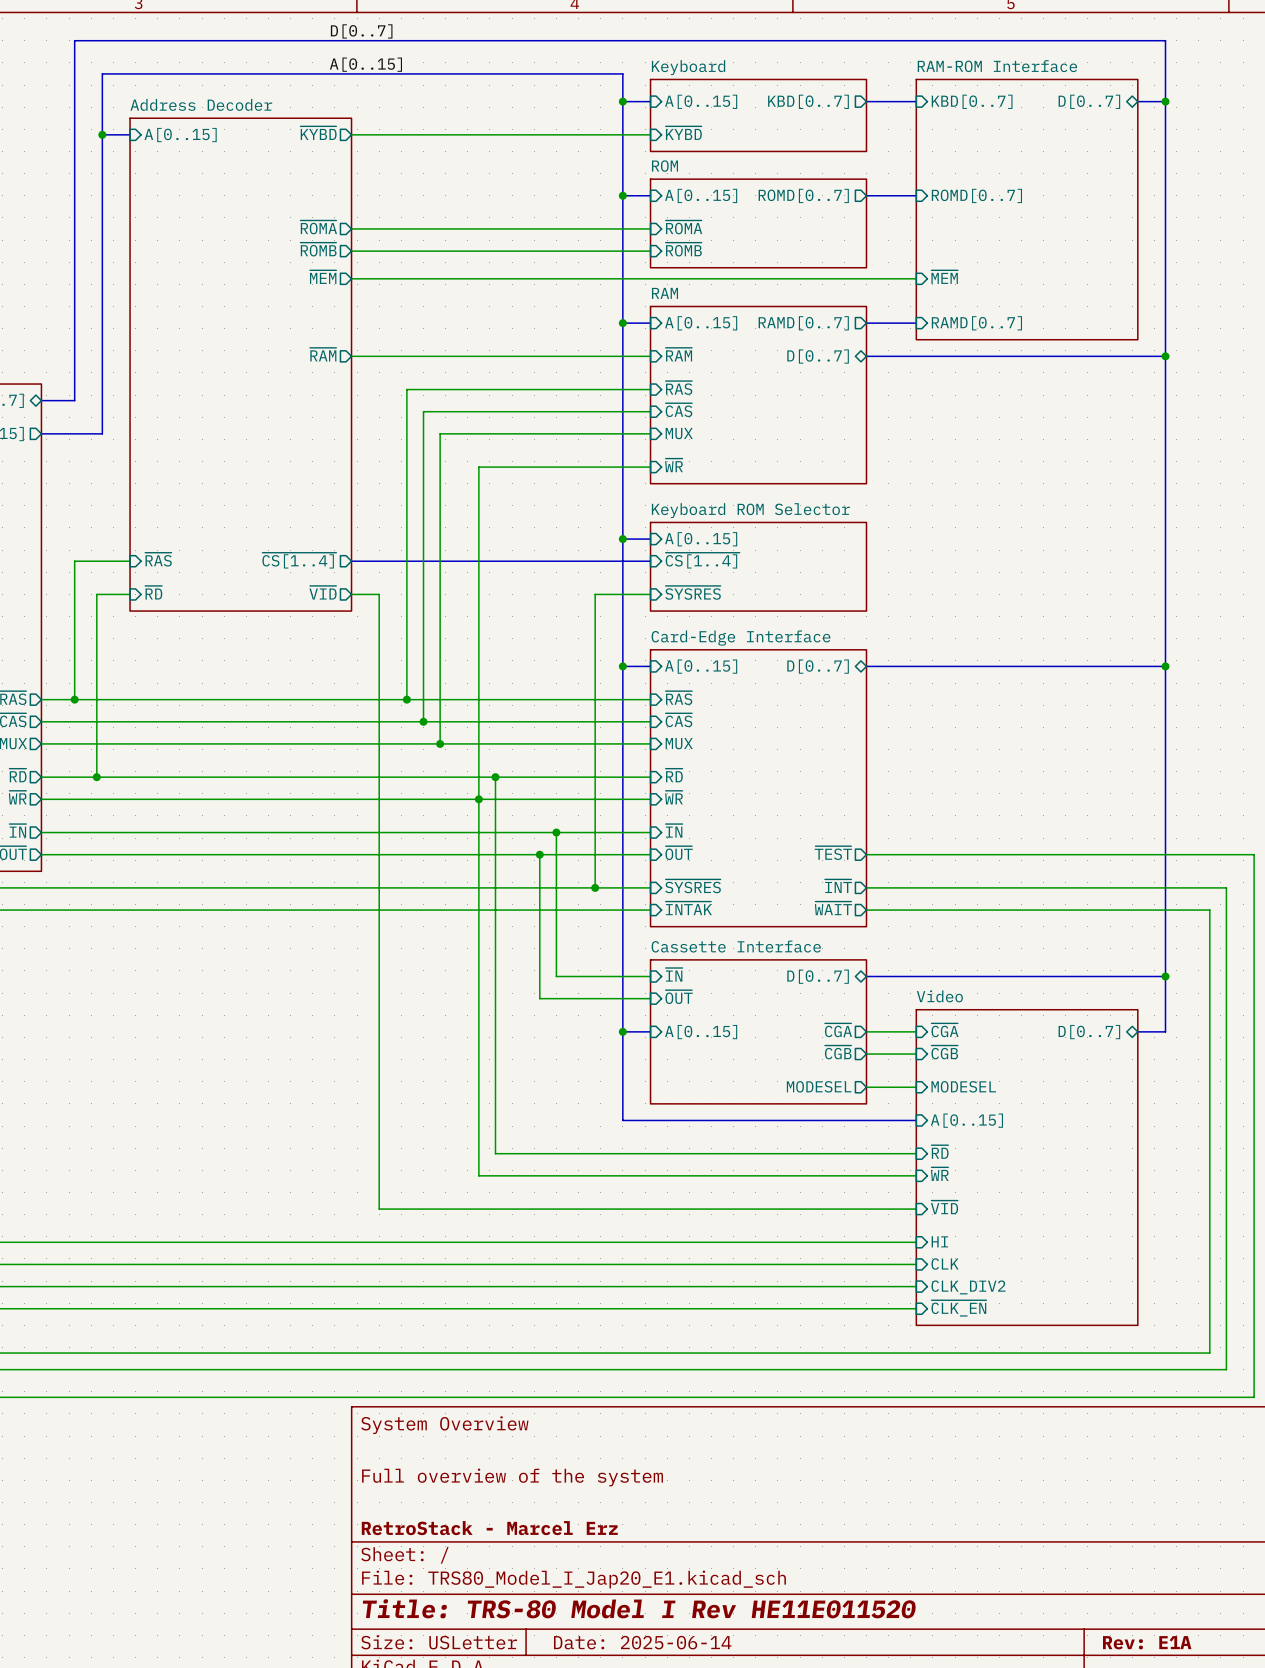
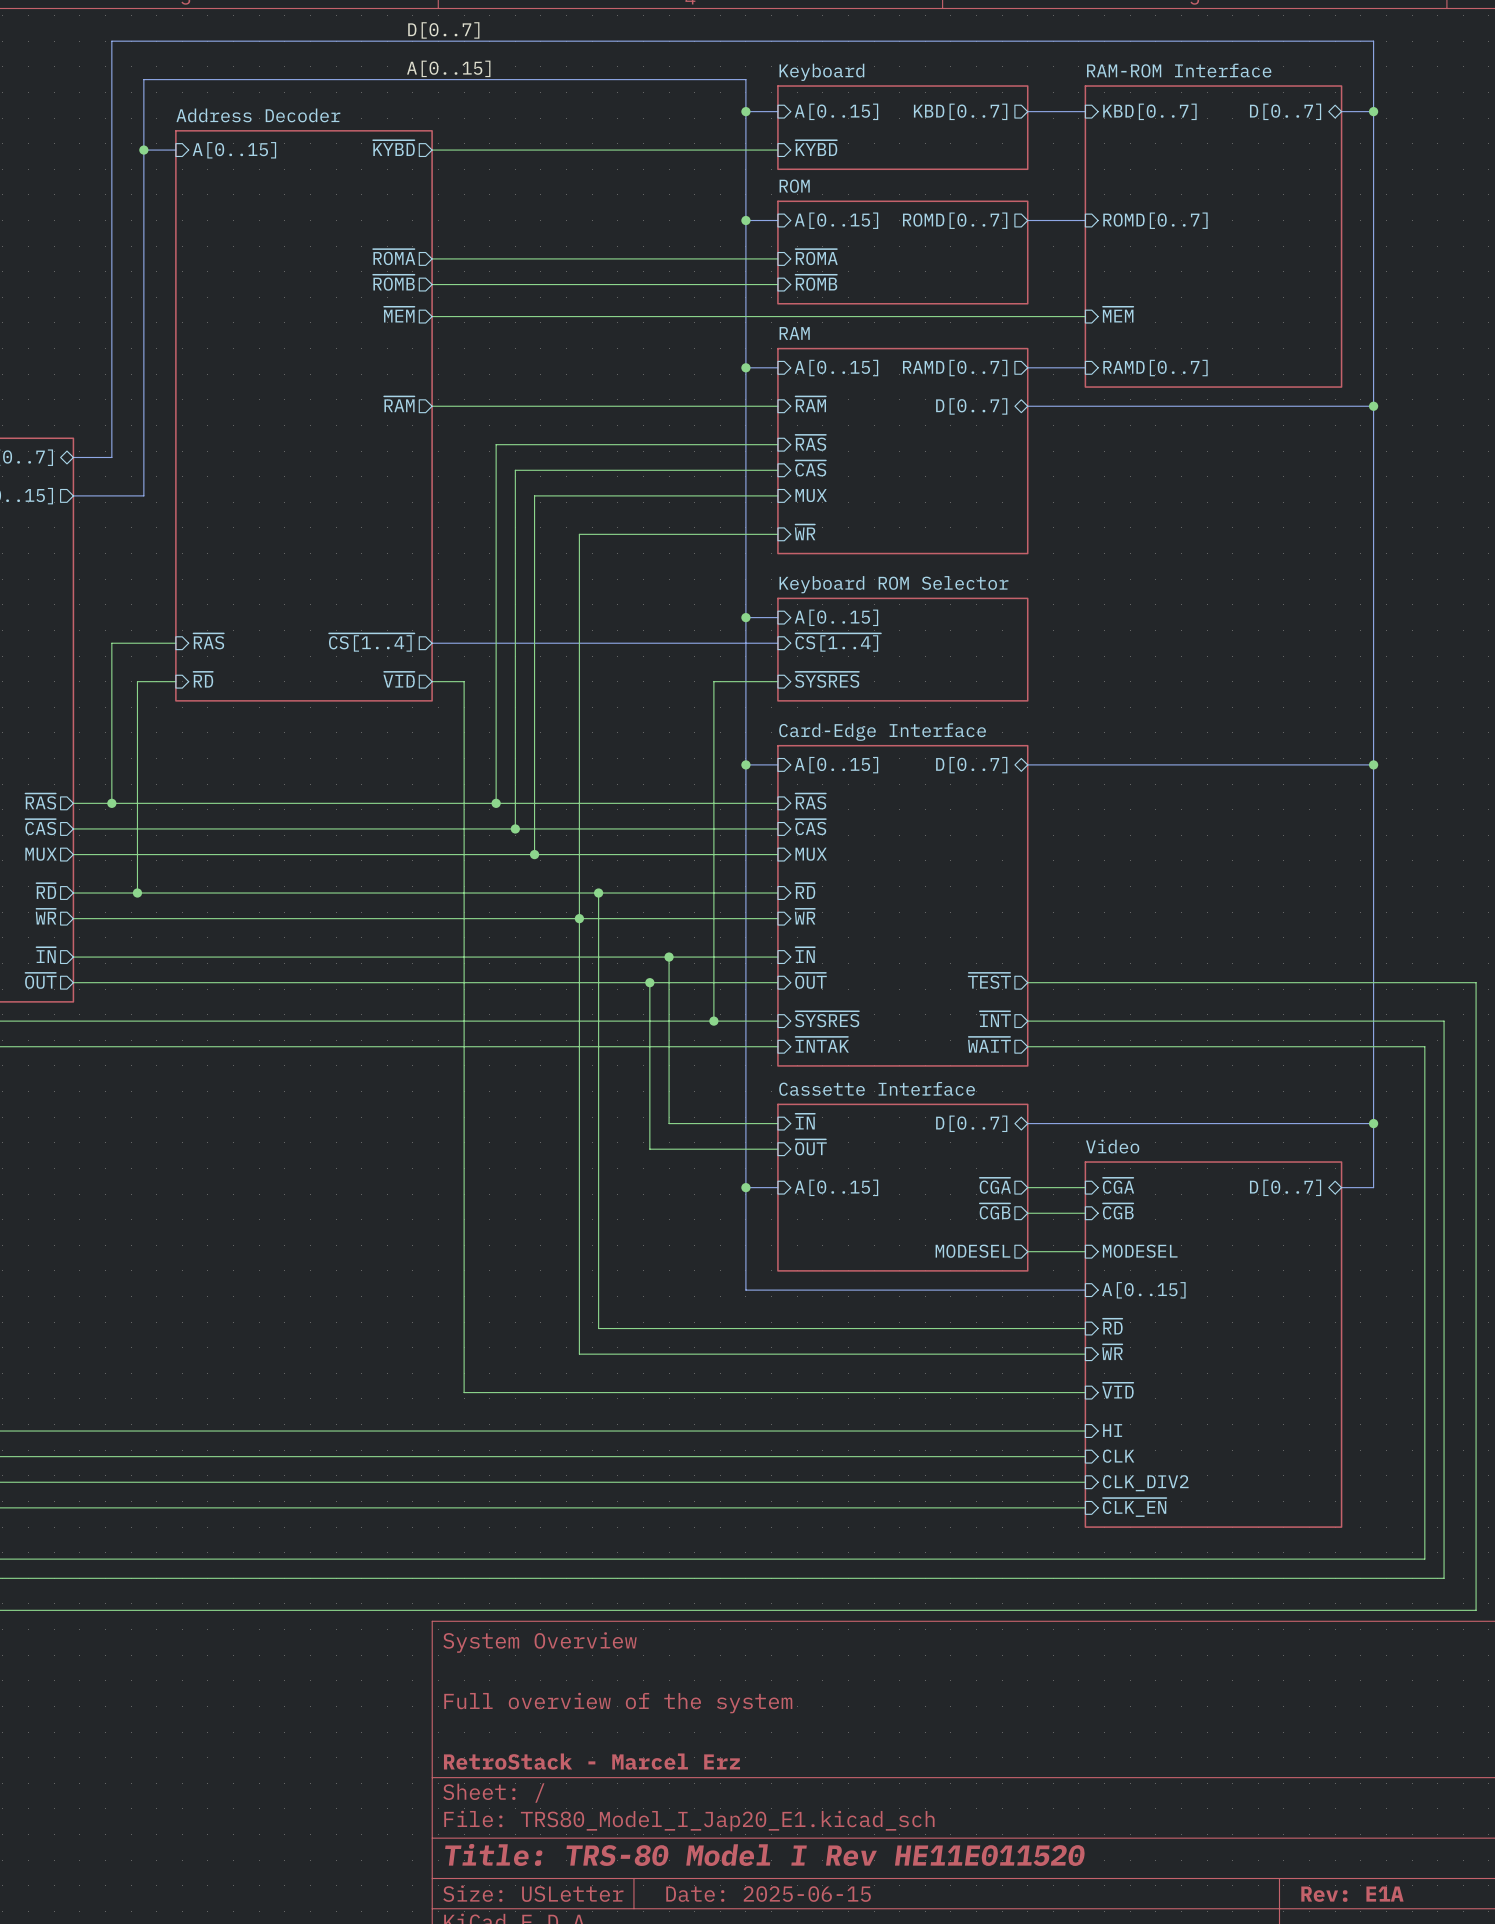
title block: Date: 2025-06-14 (642, 1642) -> Date: 2025-06-15 (768, 1894)

